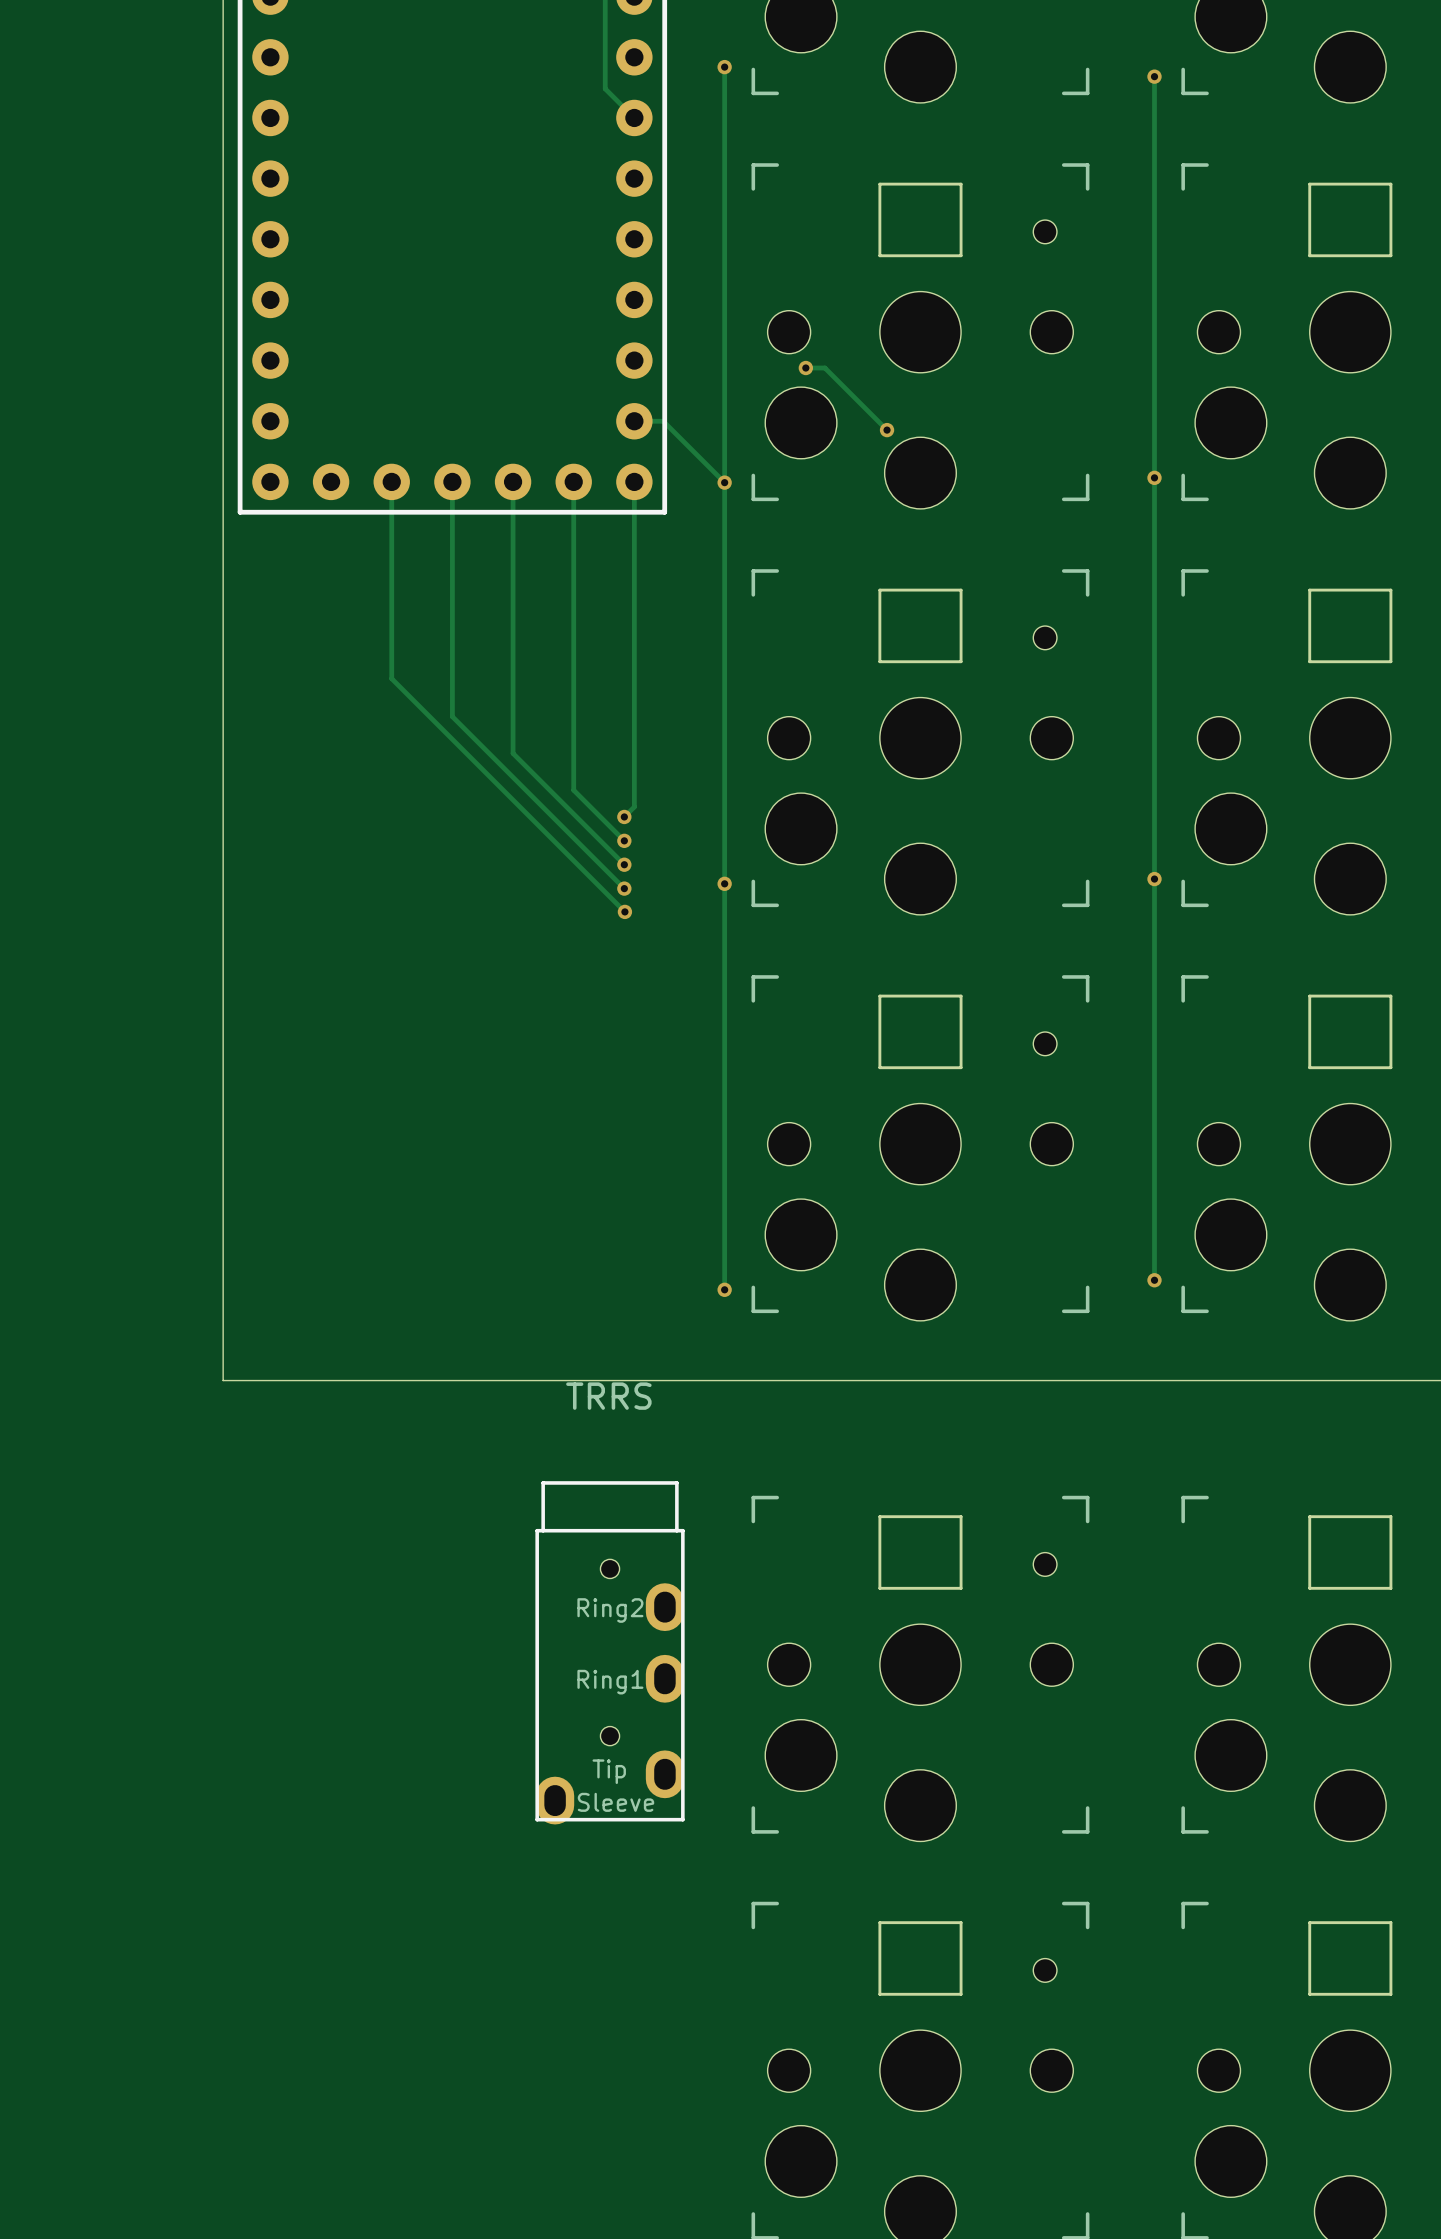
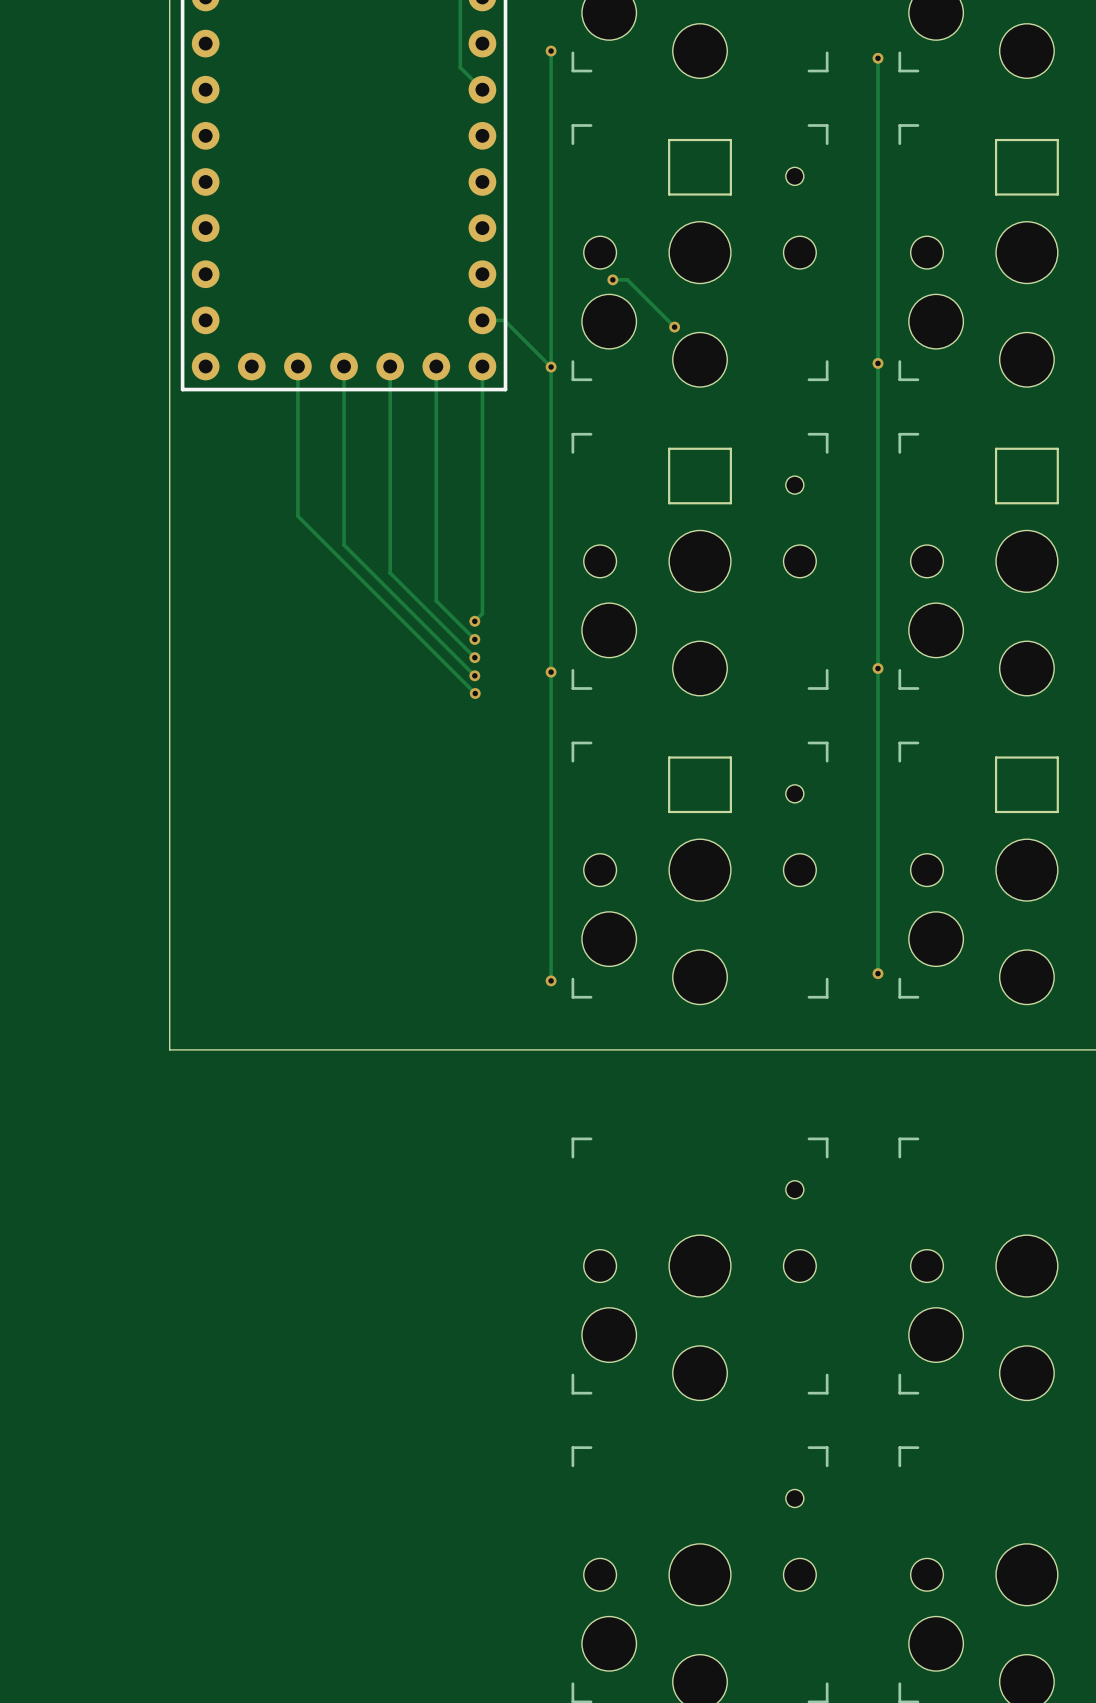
part: (920, 1552) -> none
part: (1350, 1552) -> none
part: TRRS (610, 1652) -> none
part: (920, 1958) -> none
part: (1350, 1958) -> none

